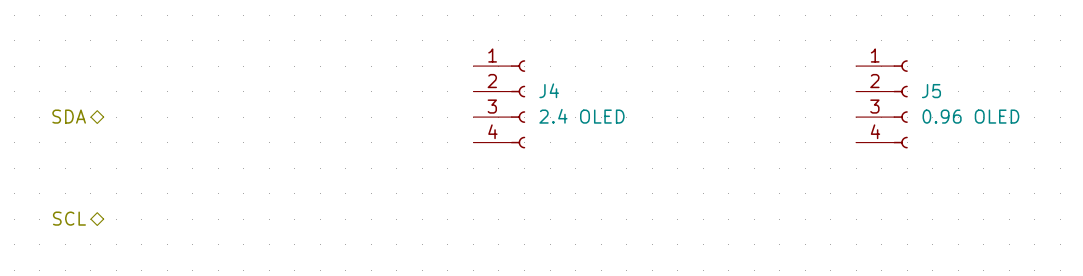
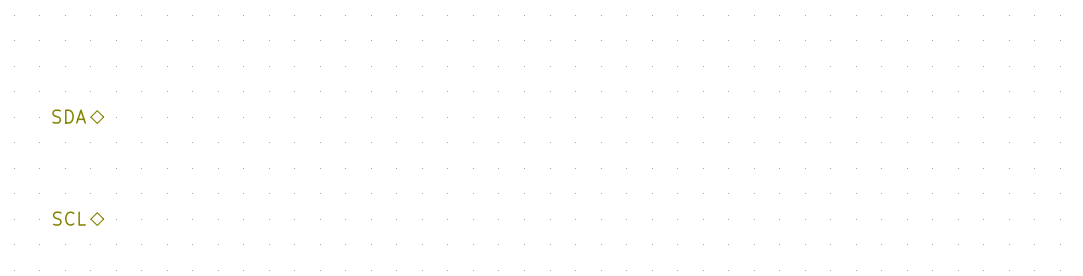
J4: 2.4 OLED (499, 104) -> none
J5: 0.96 OLED (881, 104) -> none

